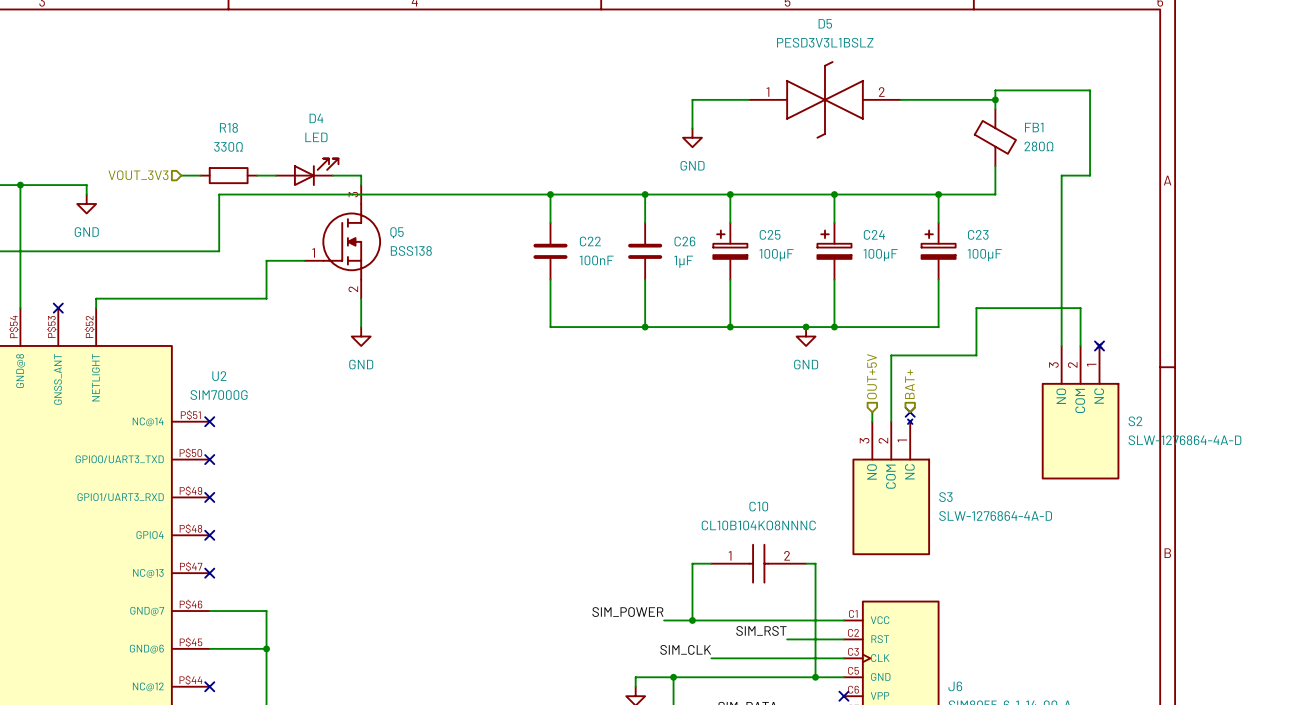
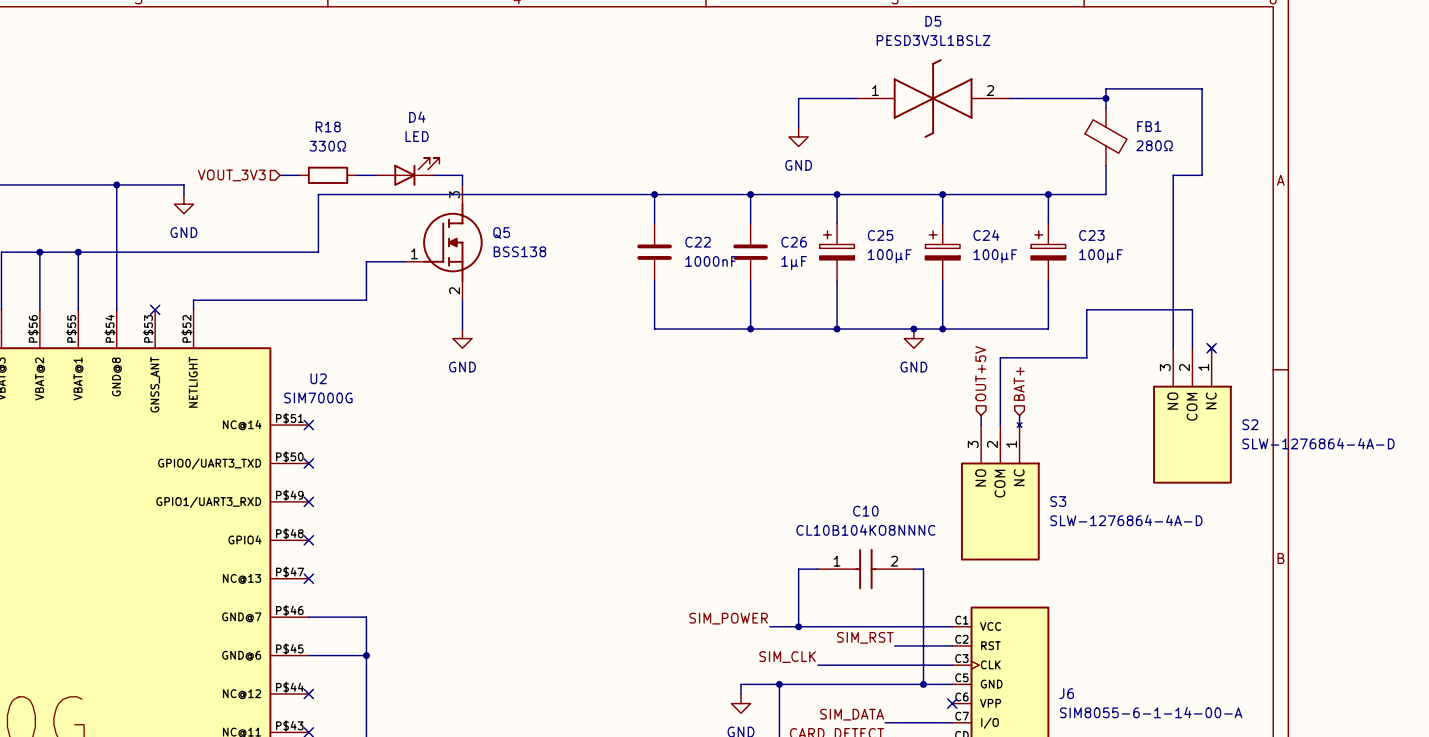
C22 value: 100nF (596, 260) -> 1000nF (711, 261)
wire: none -> (1019, 415) (1019, 425)
no-connect mark: (910, 412) -> none

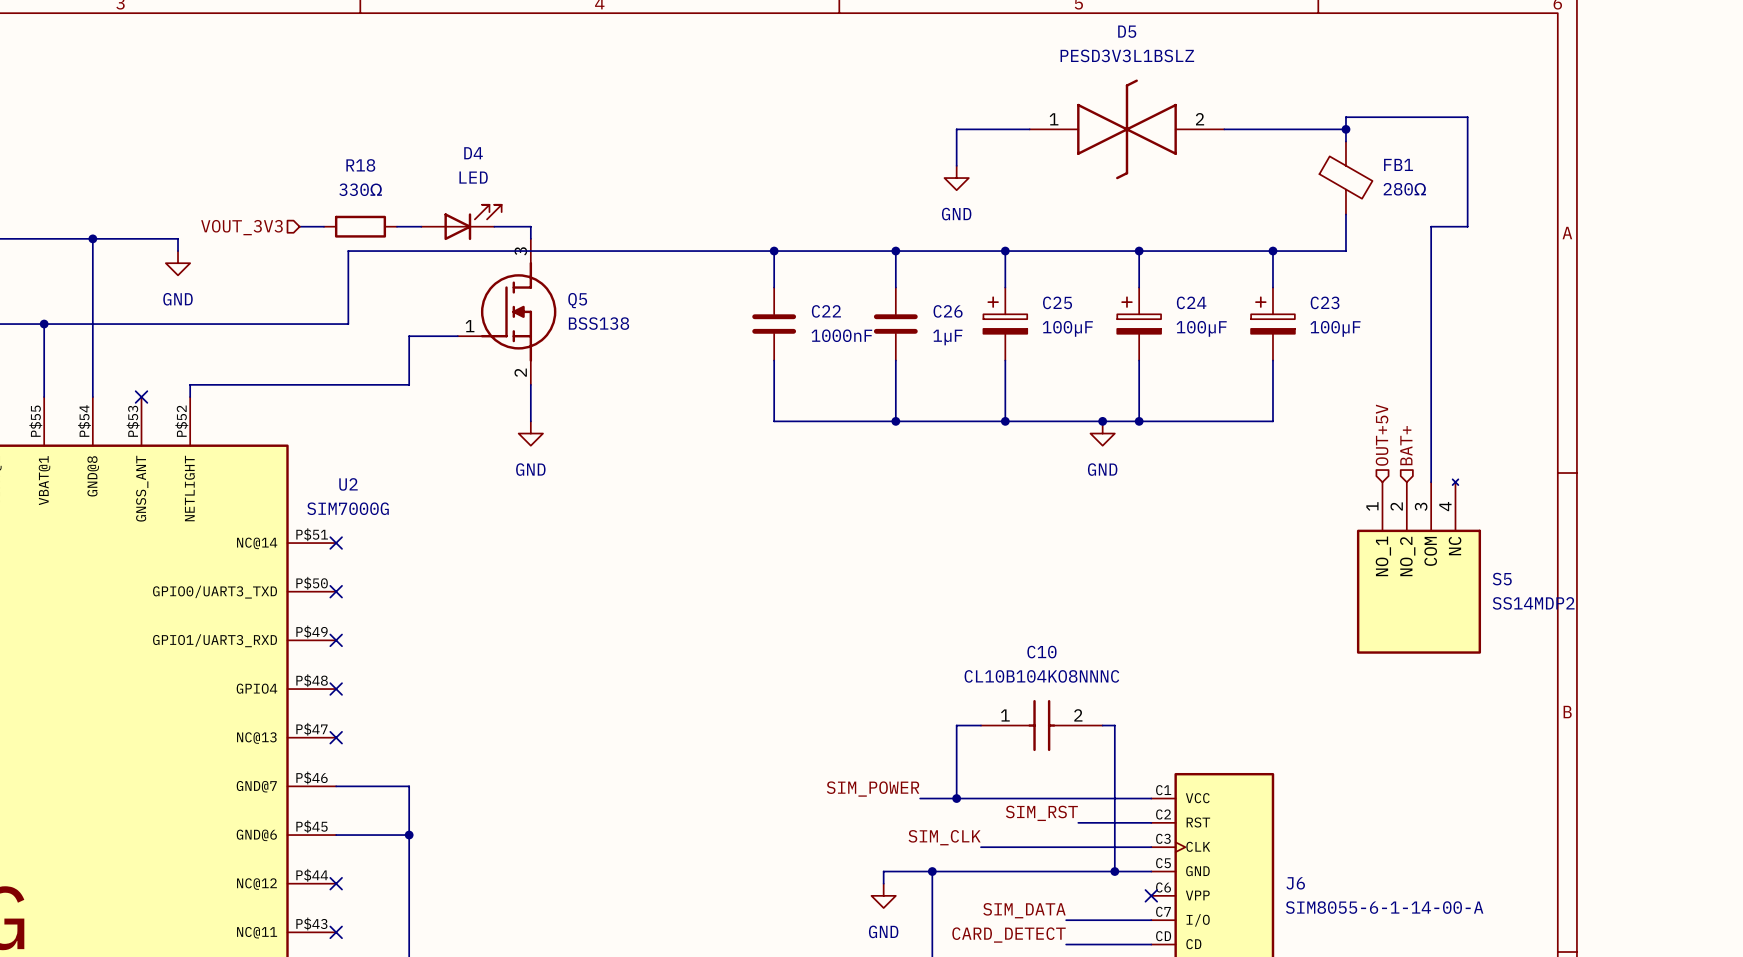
wire: (1192, 348) (1192, 309) (1086, 309) (1086, 357) (1000, 357) (1000, 425) -> none
no-connect mark: (1211, 348) -> none
hierarchical label position: OUT+5V (980, 373) -> OUT+5V (1382, 435)
hierarchical label position: BAT+ (1019, 383) -> BAT+ (1406, 445)
S2: SLW-1276864-4A-D (1192, 414) -> none
wire: (981, 415) (981, 425) -> none
wire: (1019, 415) (1019, 425) -> none
S5: none -> SS14MDP2 (1418, 566)
S3: SLW-1276864-4A-D (1000, 491) -> none

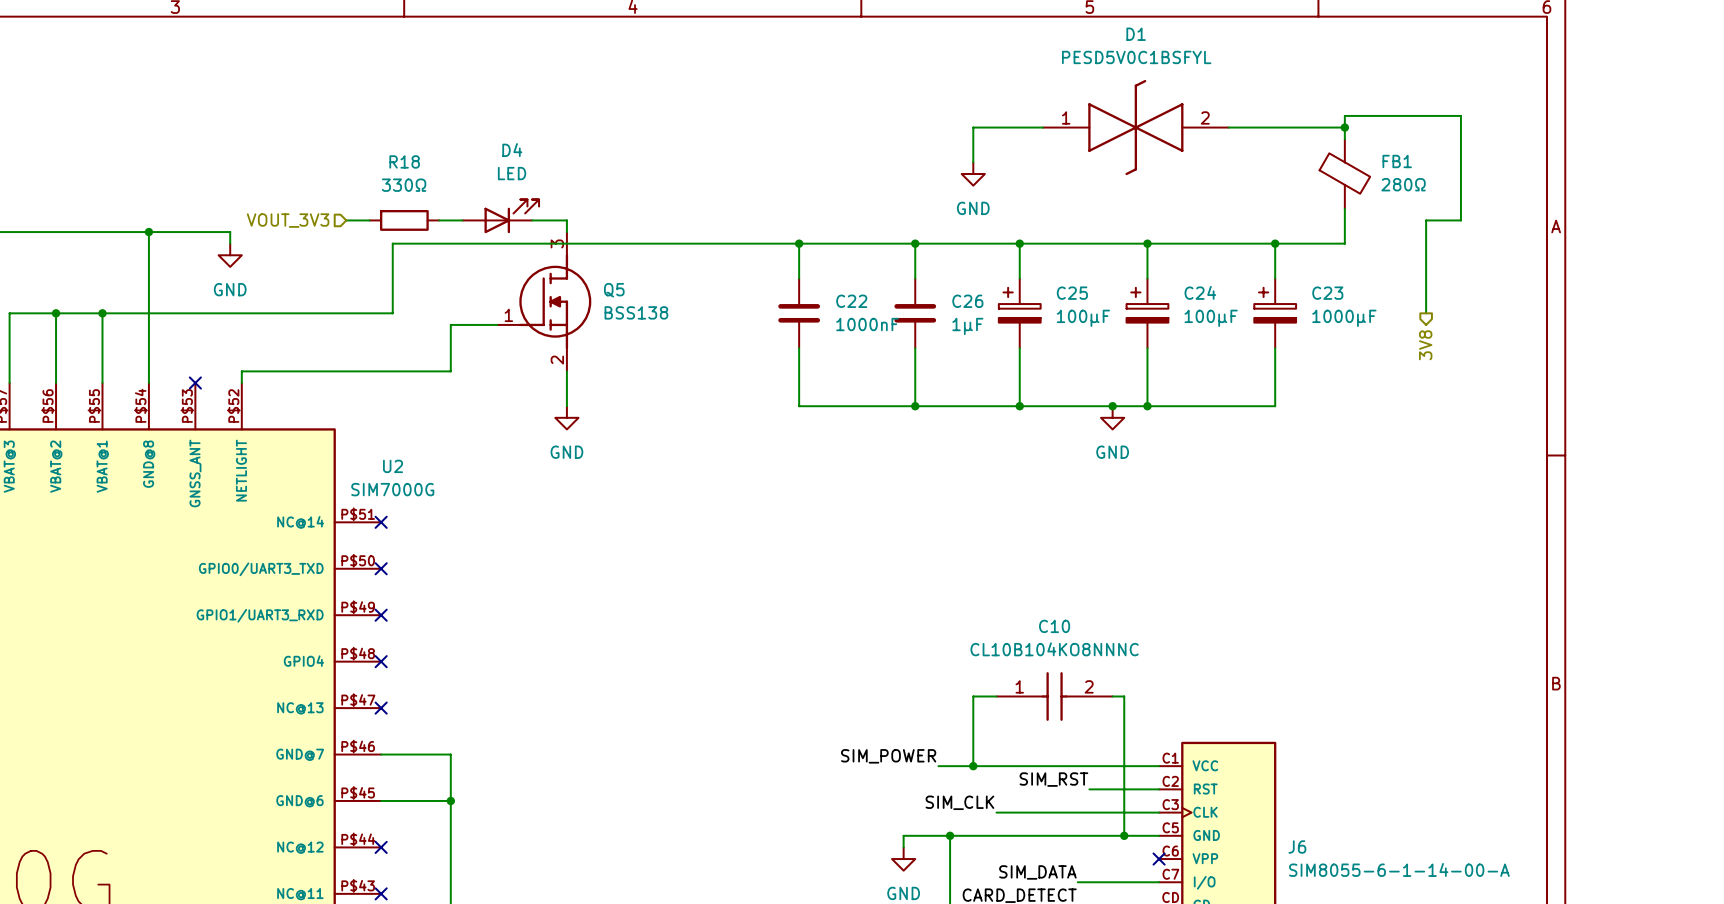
D5 name: D5 (1127, 31) -> D1 (1136, 34)
D5 value: PESD3V3L1BSLZ (1127, 55) -> PESD5V0C1BSFYL (1136, 57)
wire: (1431, 324) (1431, 482) -> none
C23 value: 100µF (1335, 328) -> 1000µF (1344, 318)
hierarchical label: none -> 3V8 (1425, 345)
hierarchical label: OUT+5V (1382, 435) -> none
hierarchical label: BAT+ (1406, 445) -> none
S5: SS14MDP2 (1418, 566) -> none

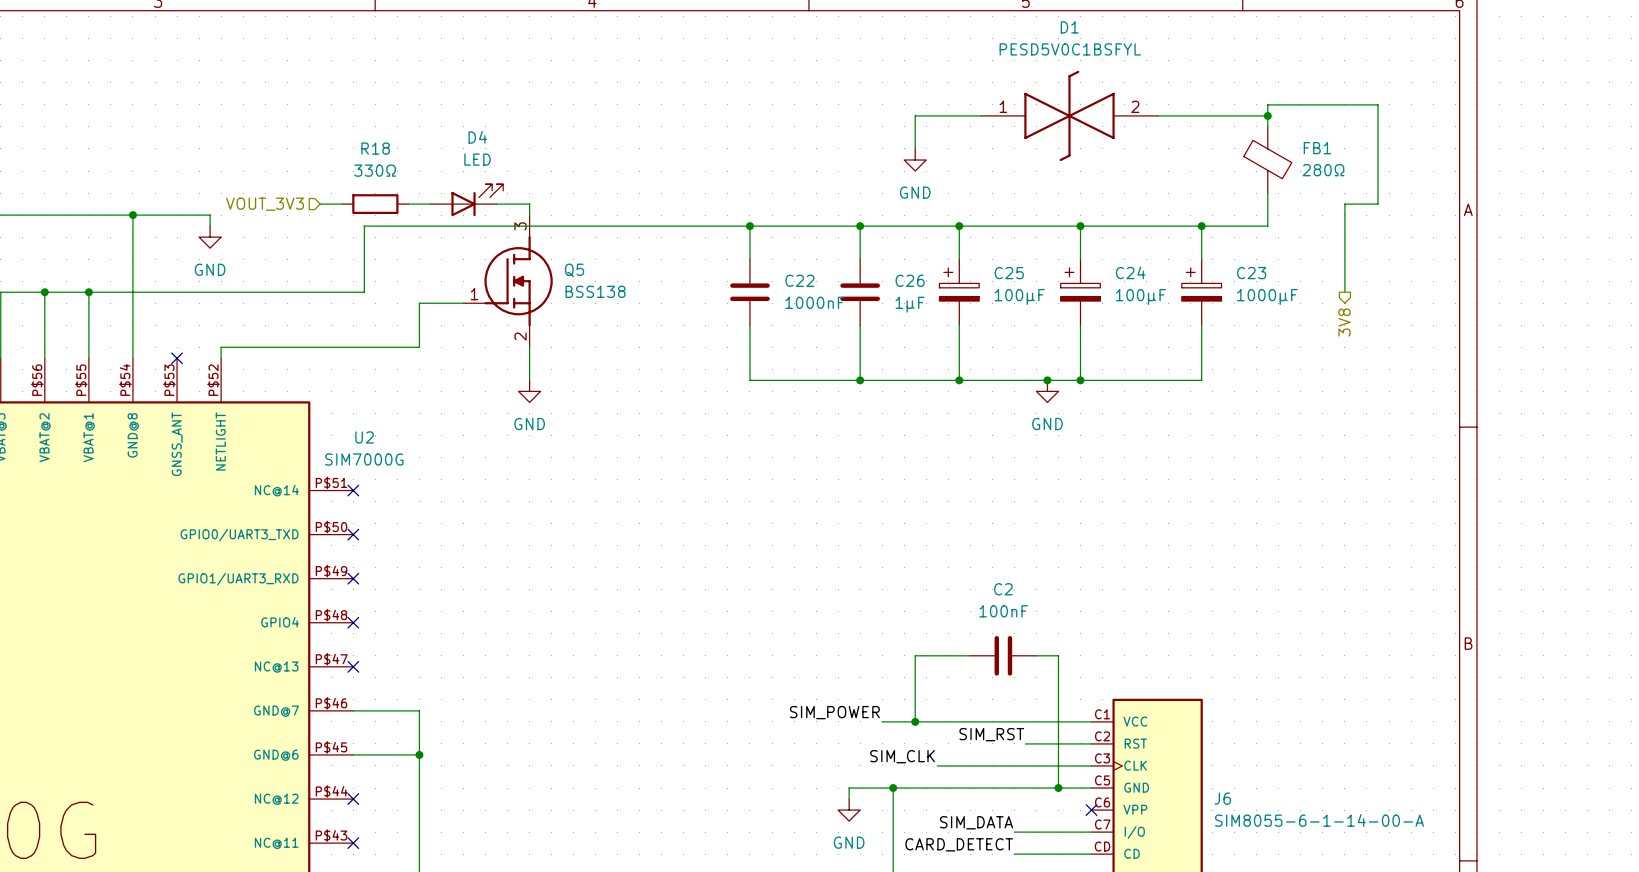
C10: CL10B104KO8NNNC (1054, 696) -> none
C2: none -> 100nF (1003, 655)

